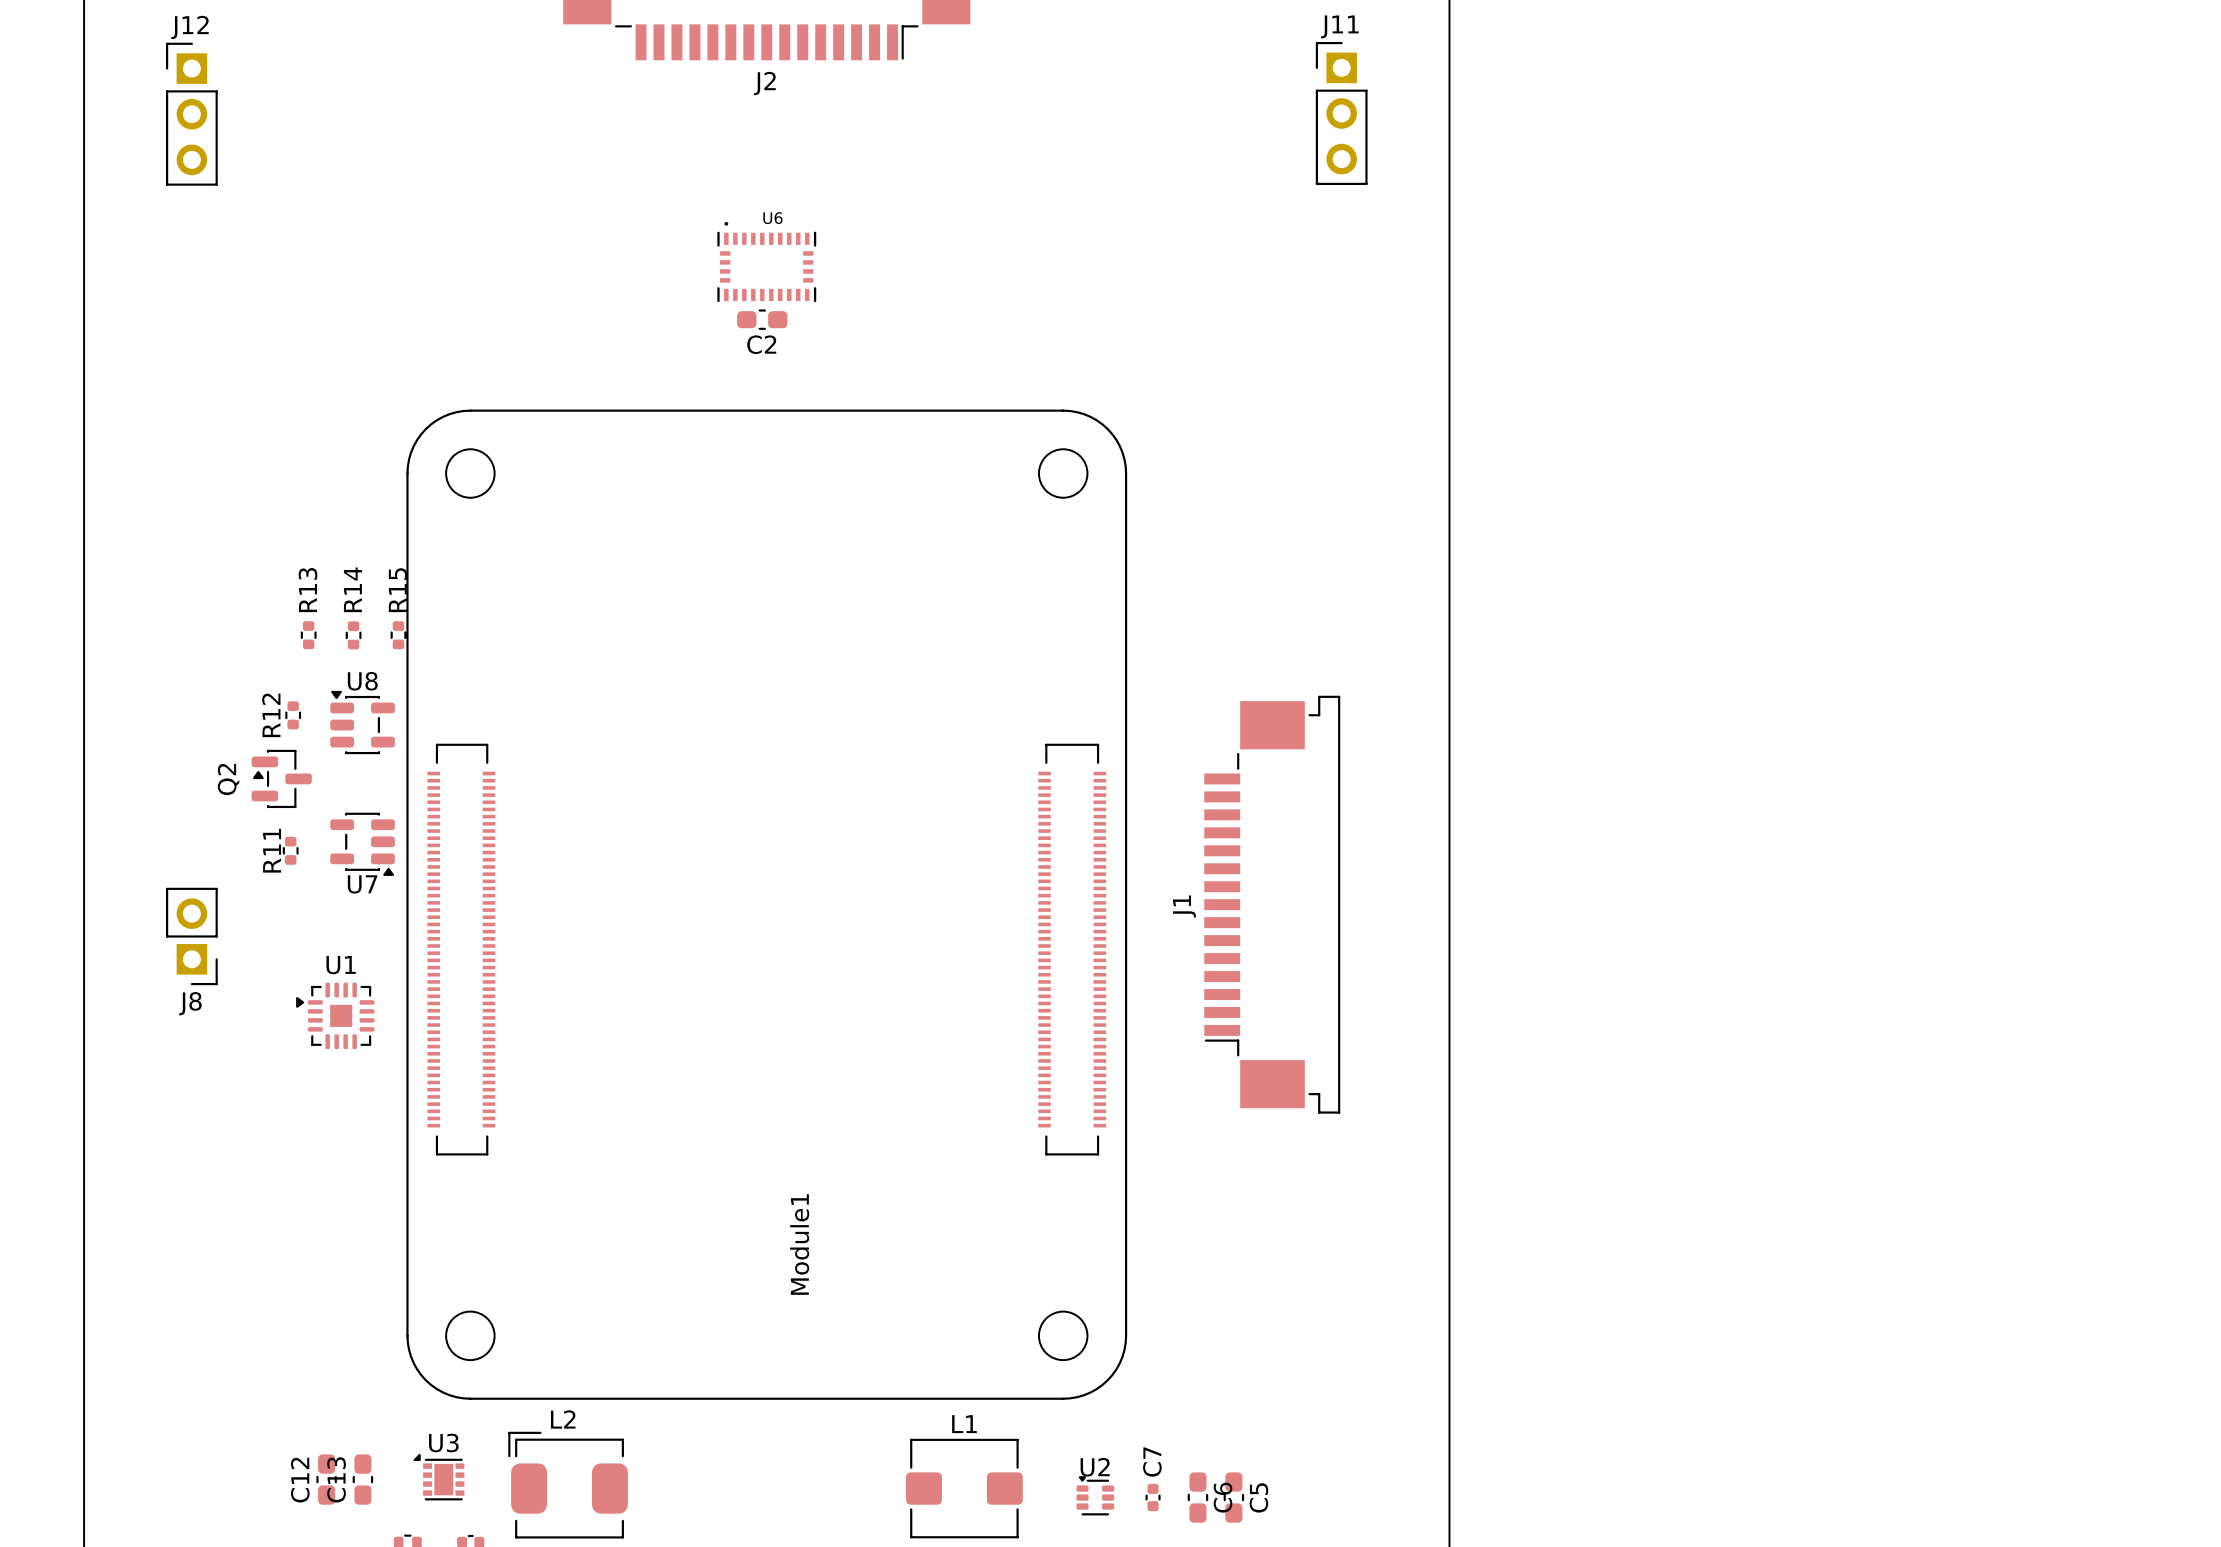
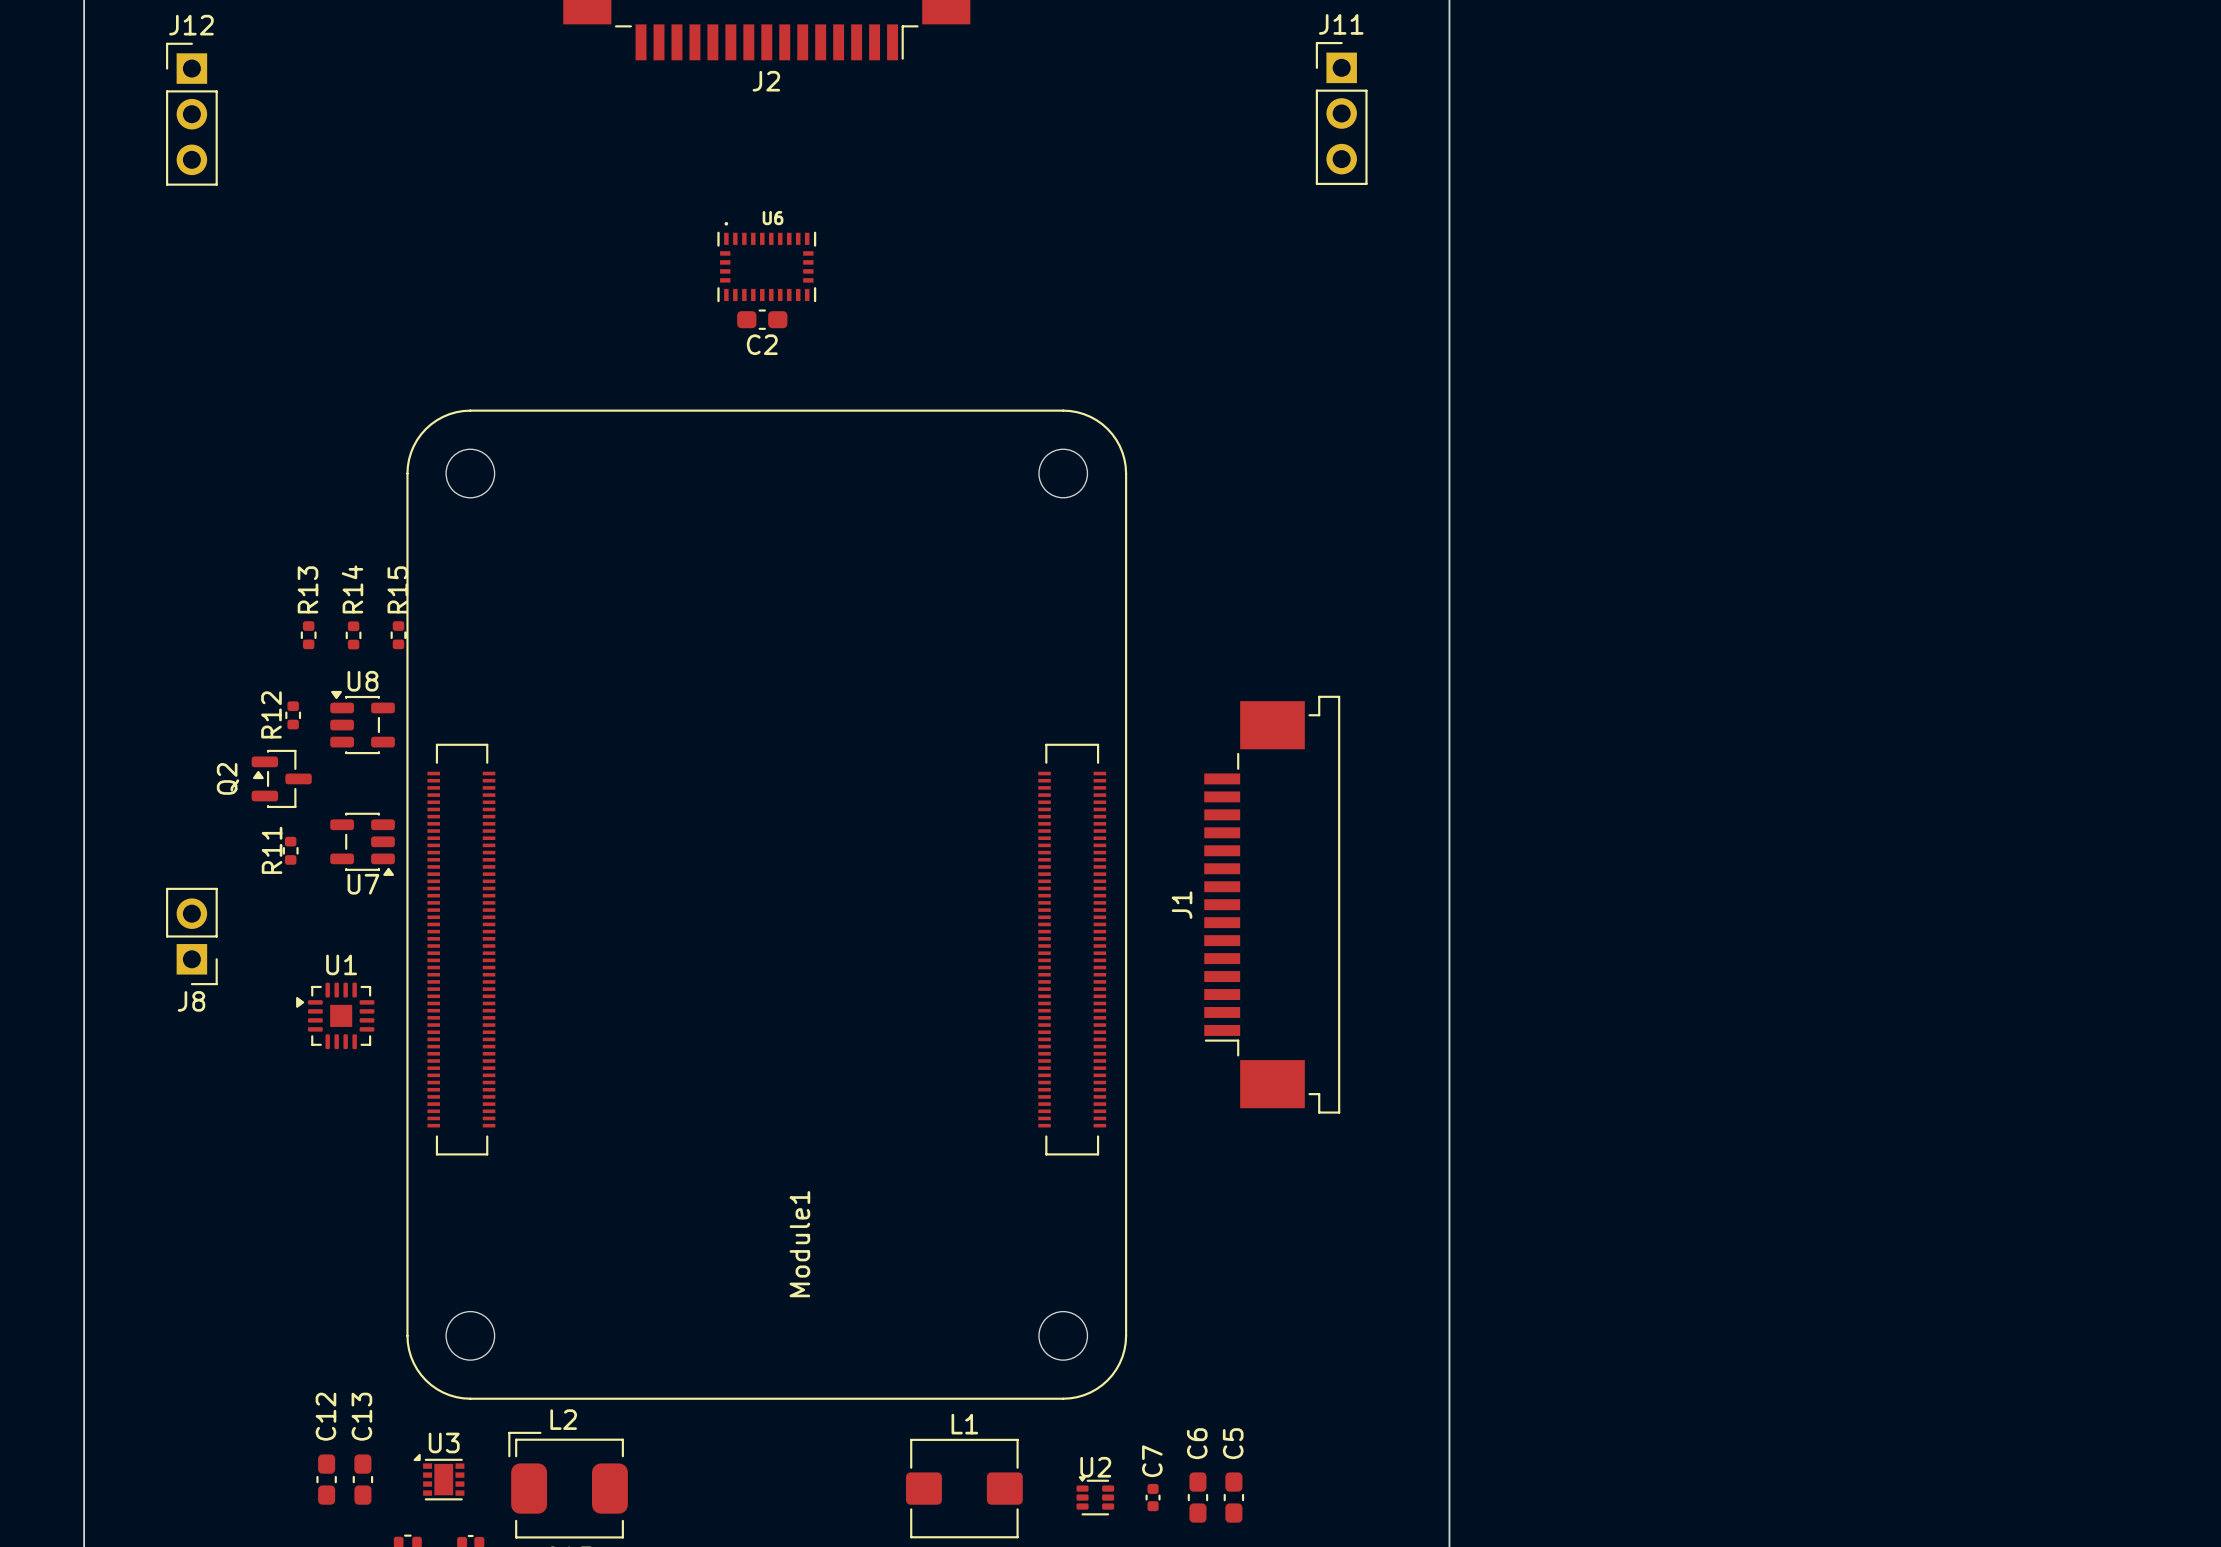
C13 name position: C13 (336, 1479) -> C13 (361, 1416)
C12 name position: C12 (300, 1480) -> C12 (325, 1416)
C6 name position: C6 (1222, 1497) -> C6 (1197, 1443)
C5 name position: C5 (1258, 1497) -> C5 (1233, 1443)

